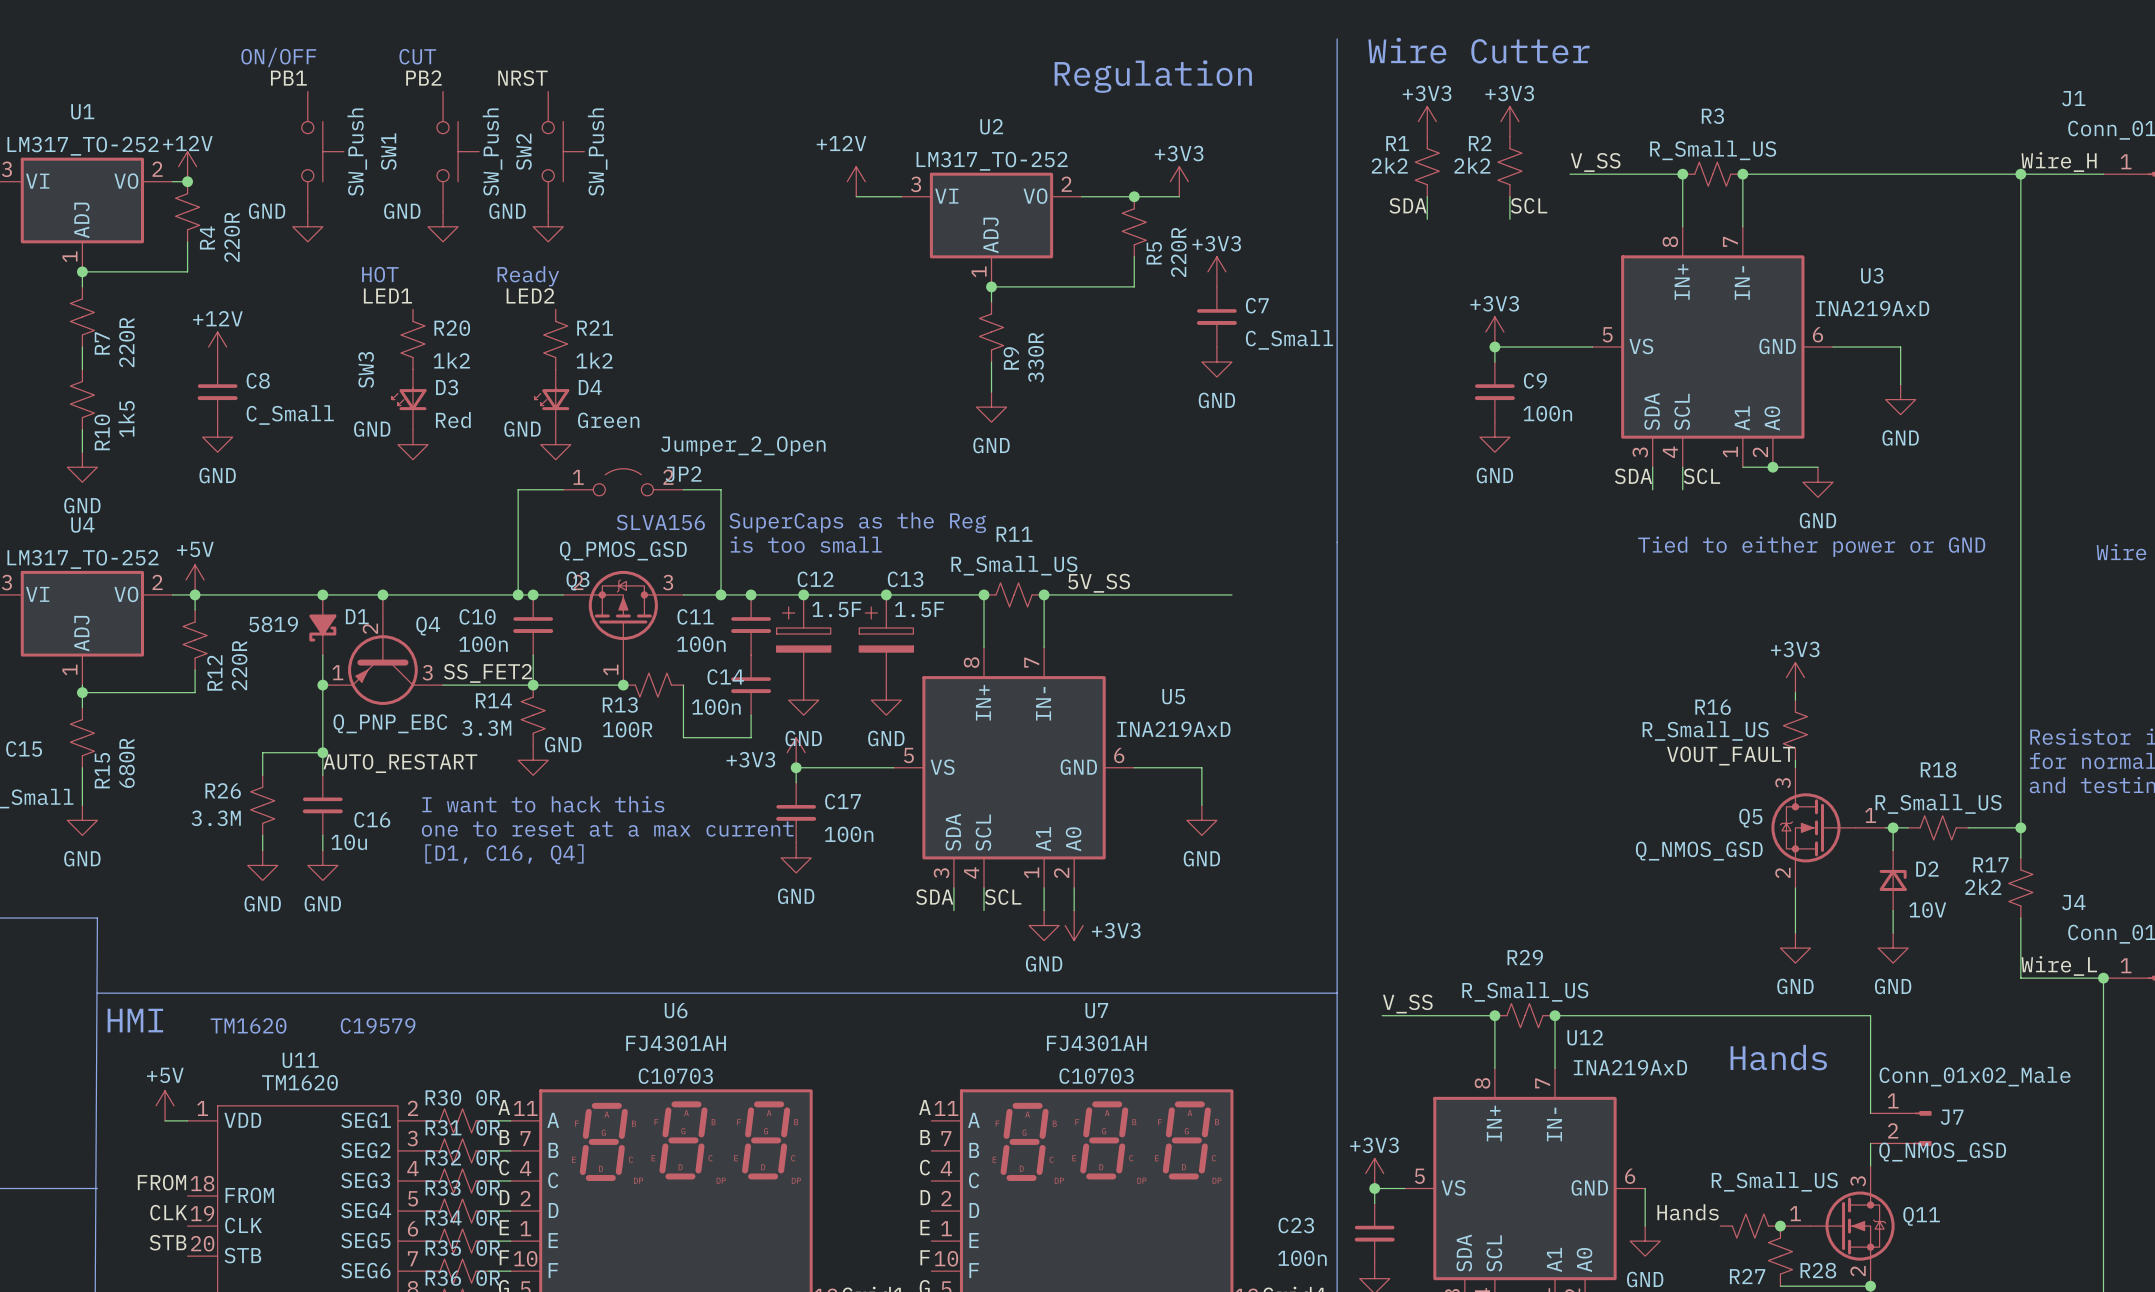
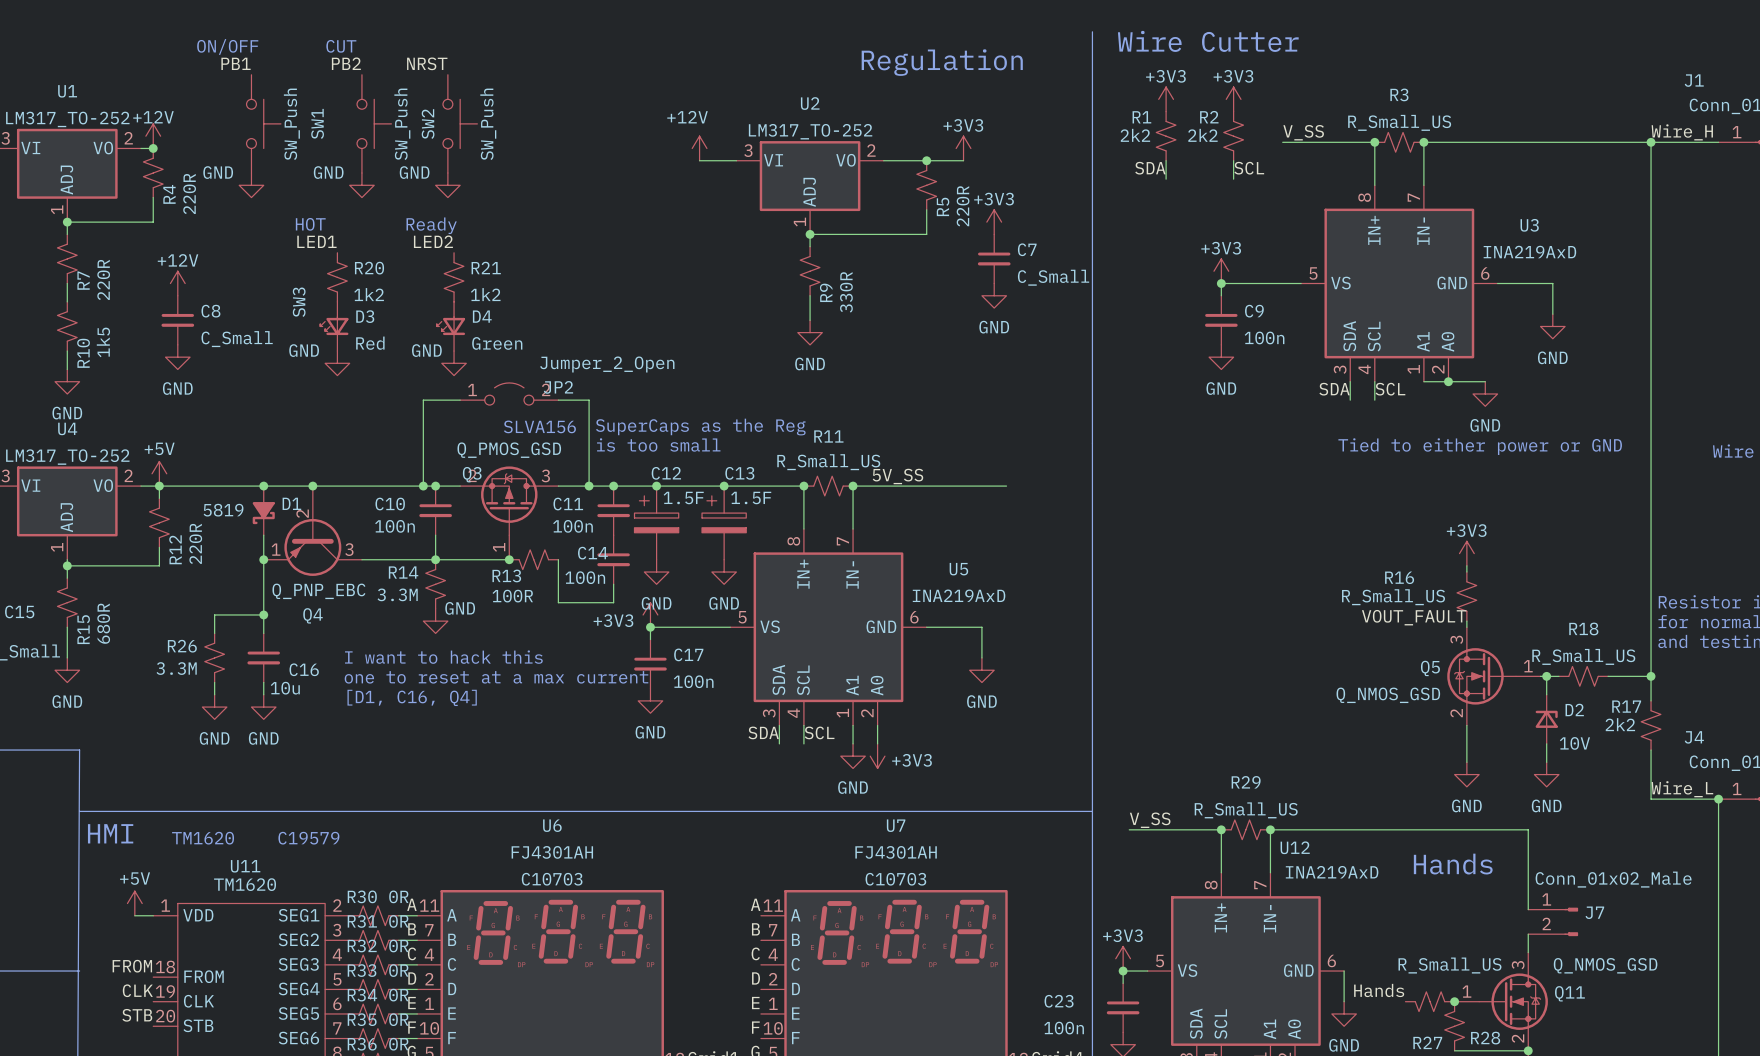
Q4 name position: Q4 (428, 626) -> Q4 (313, 615)
label: SS_FET2 (488, 673) -> none
label: AUTO_RESTART (400, 763) -> none
Q11 value position: Q_NMOS_GSD (1942, 1152) -> Q_NMOS_GSD (1605, 965)

